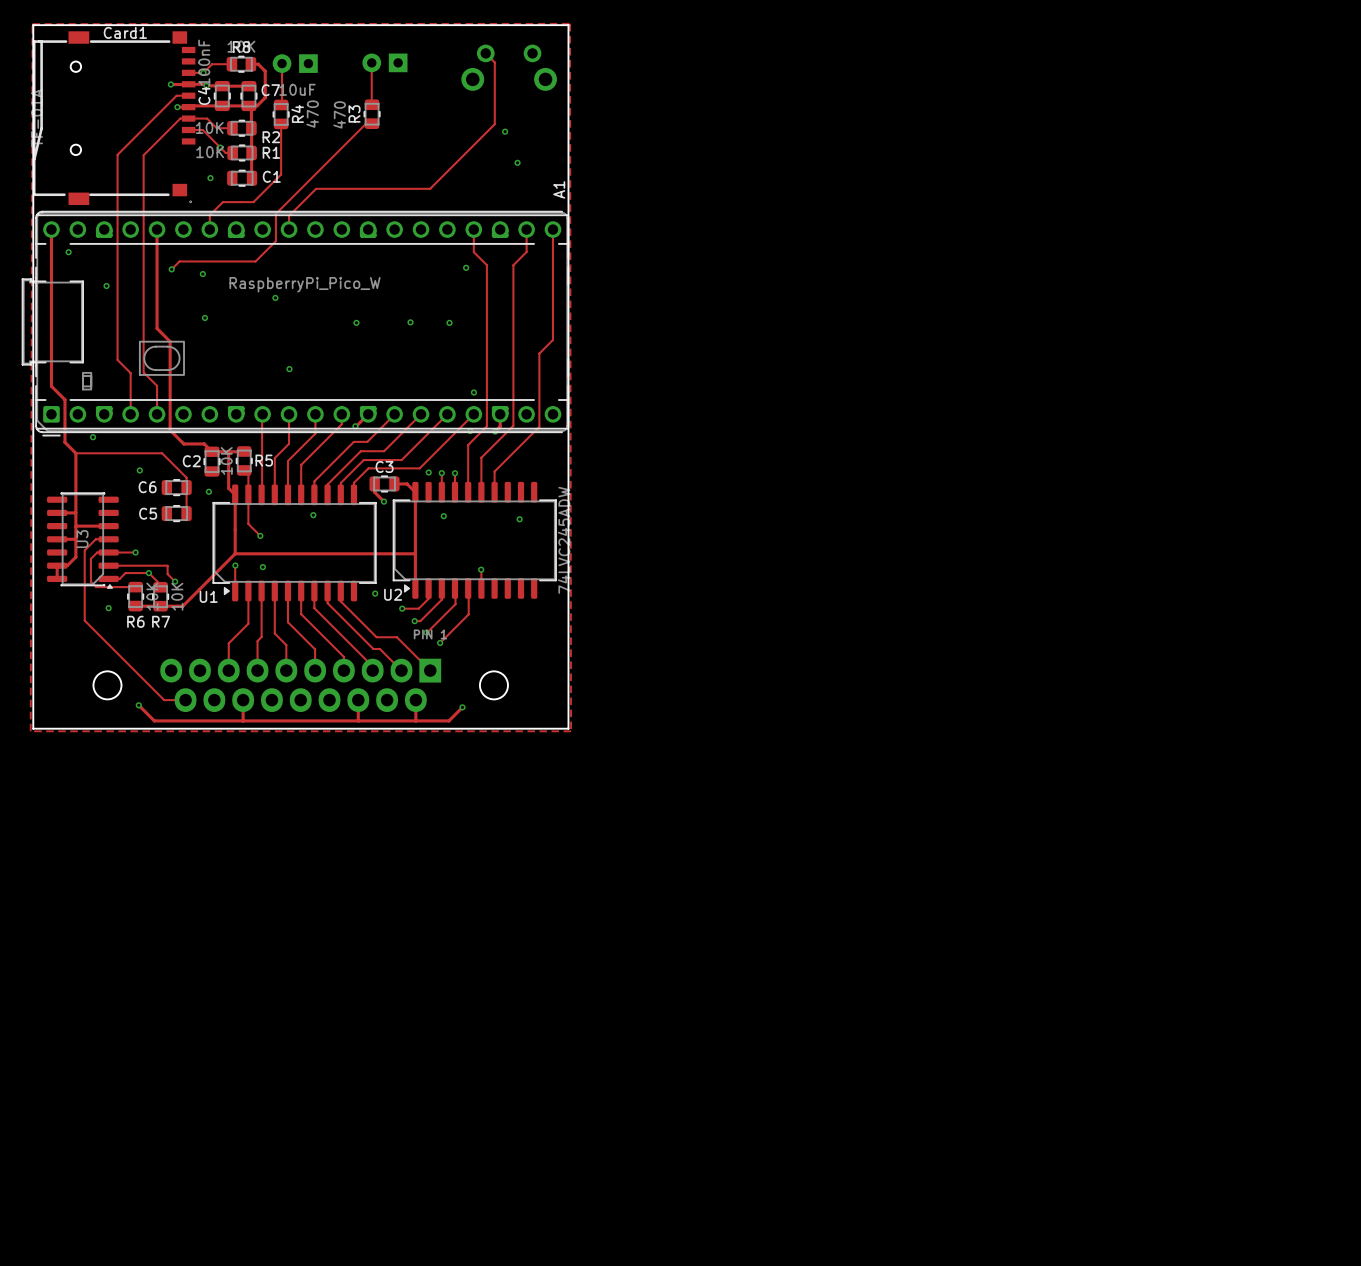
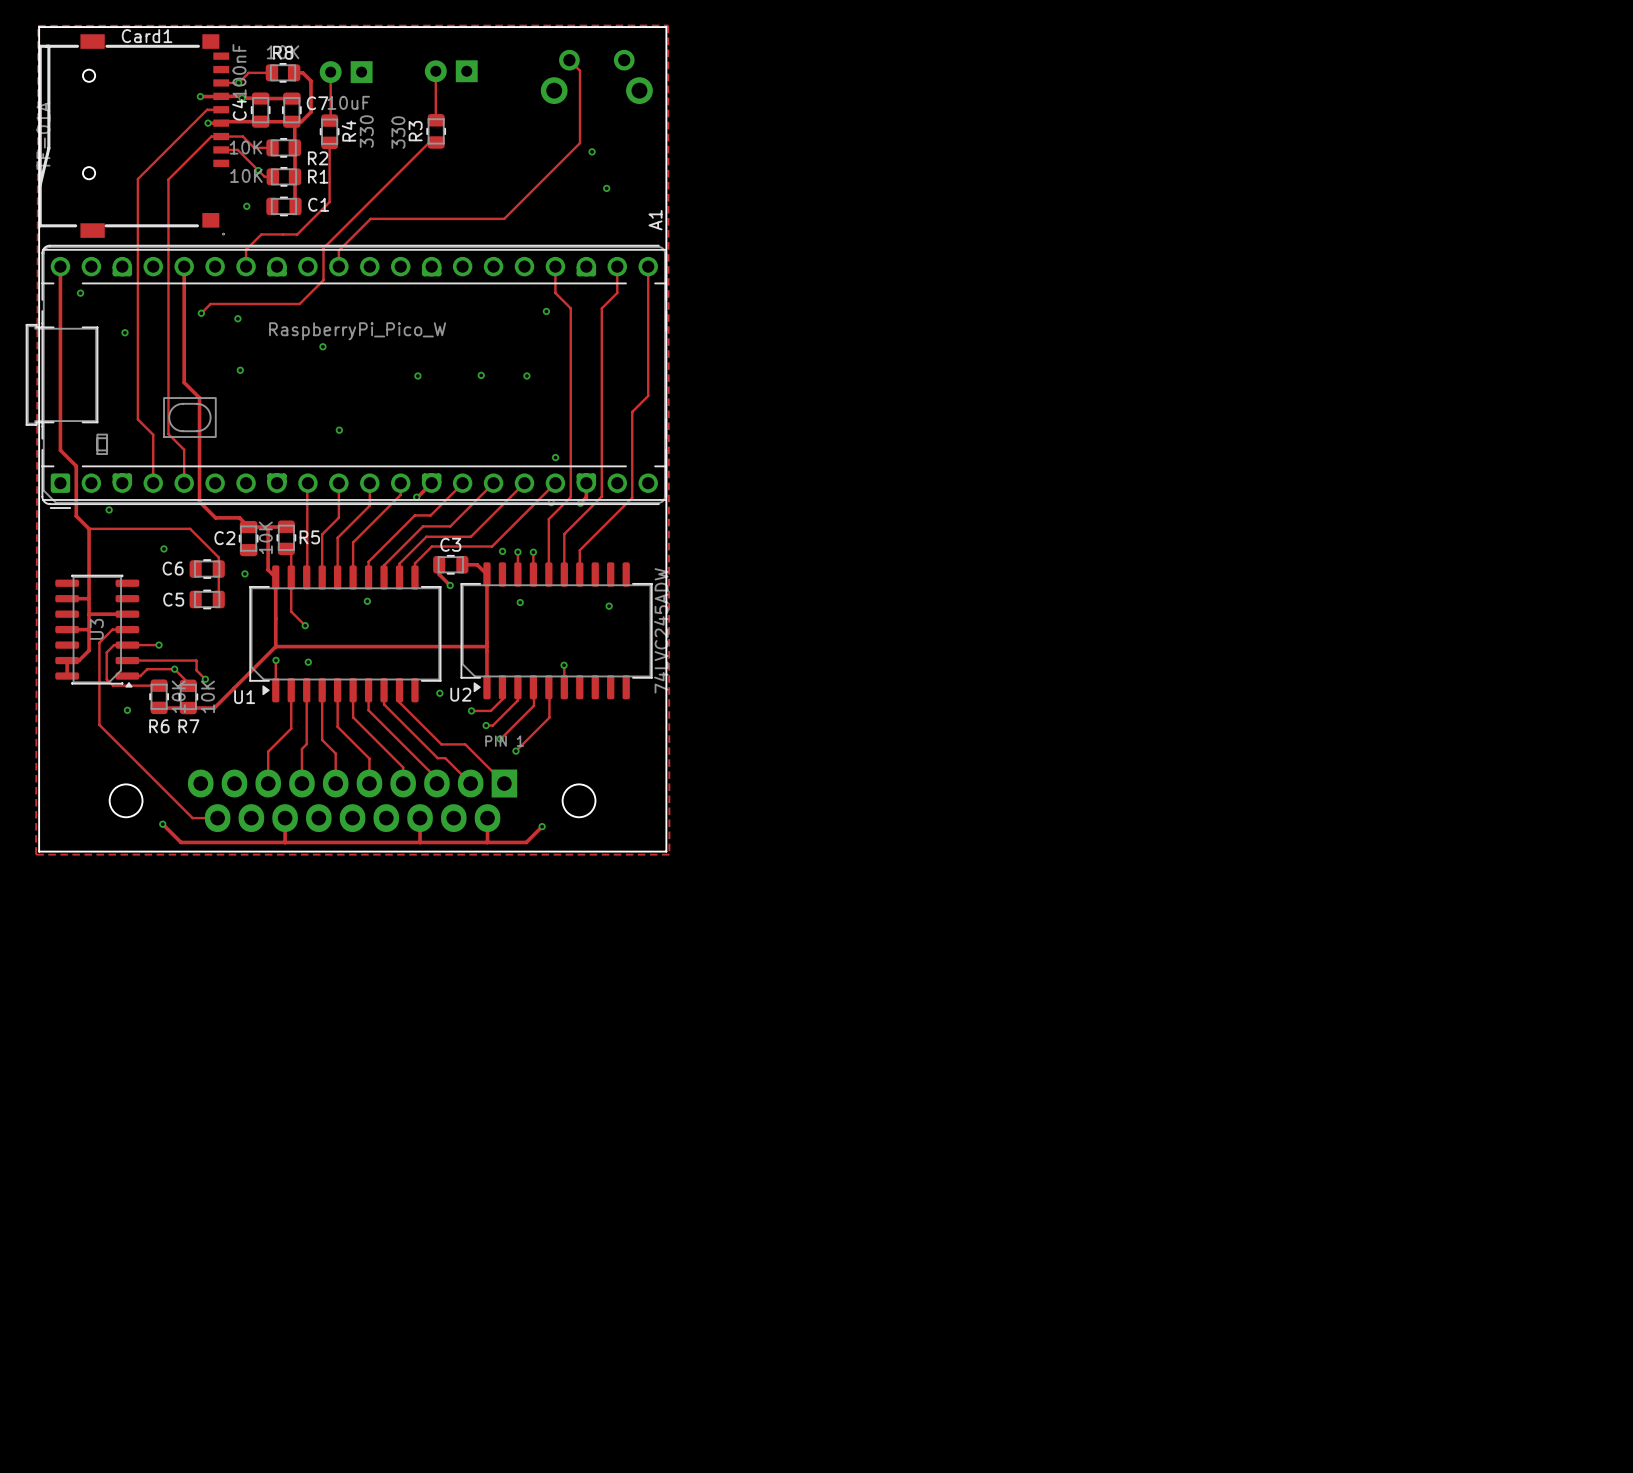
R4 value: 470 (312, 114) -> 330 (366, 131)
R3 value: 470 (339, 114) -> 330 (398, 132)

